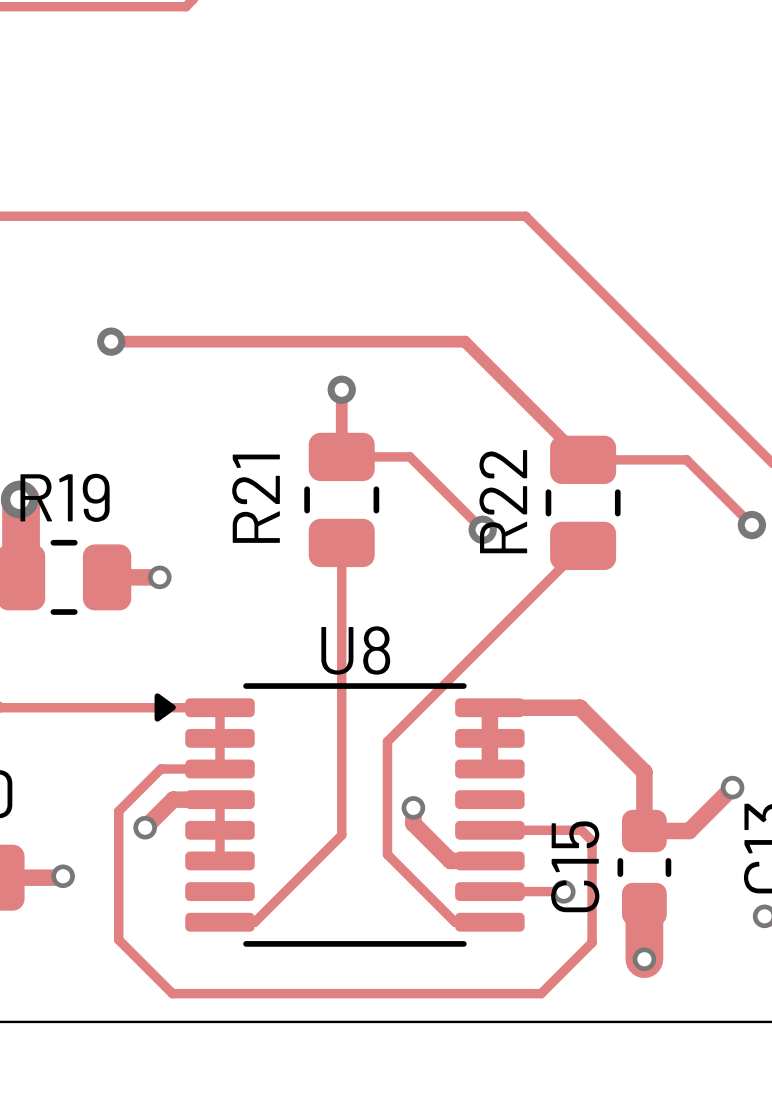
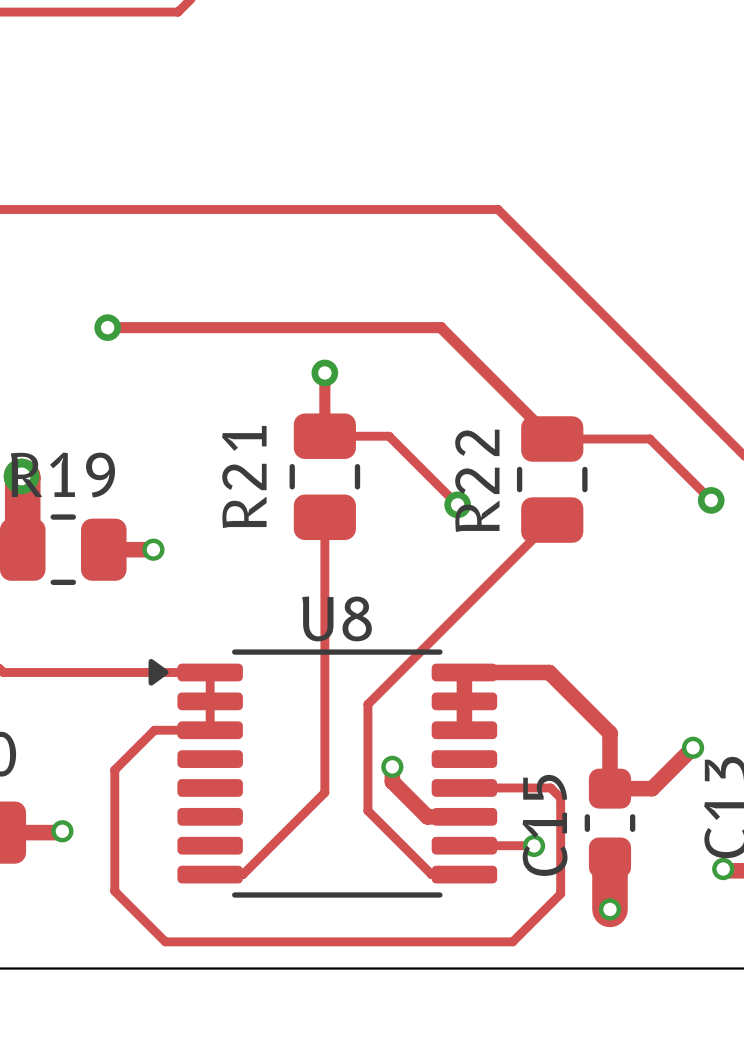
track: (145, 827) (173, 799) (219, 799) (219, 860) -> none
via: (145, 827) -> none

